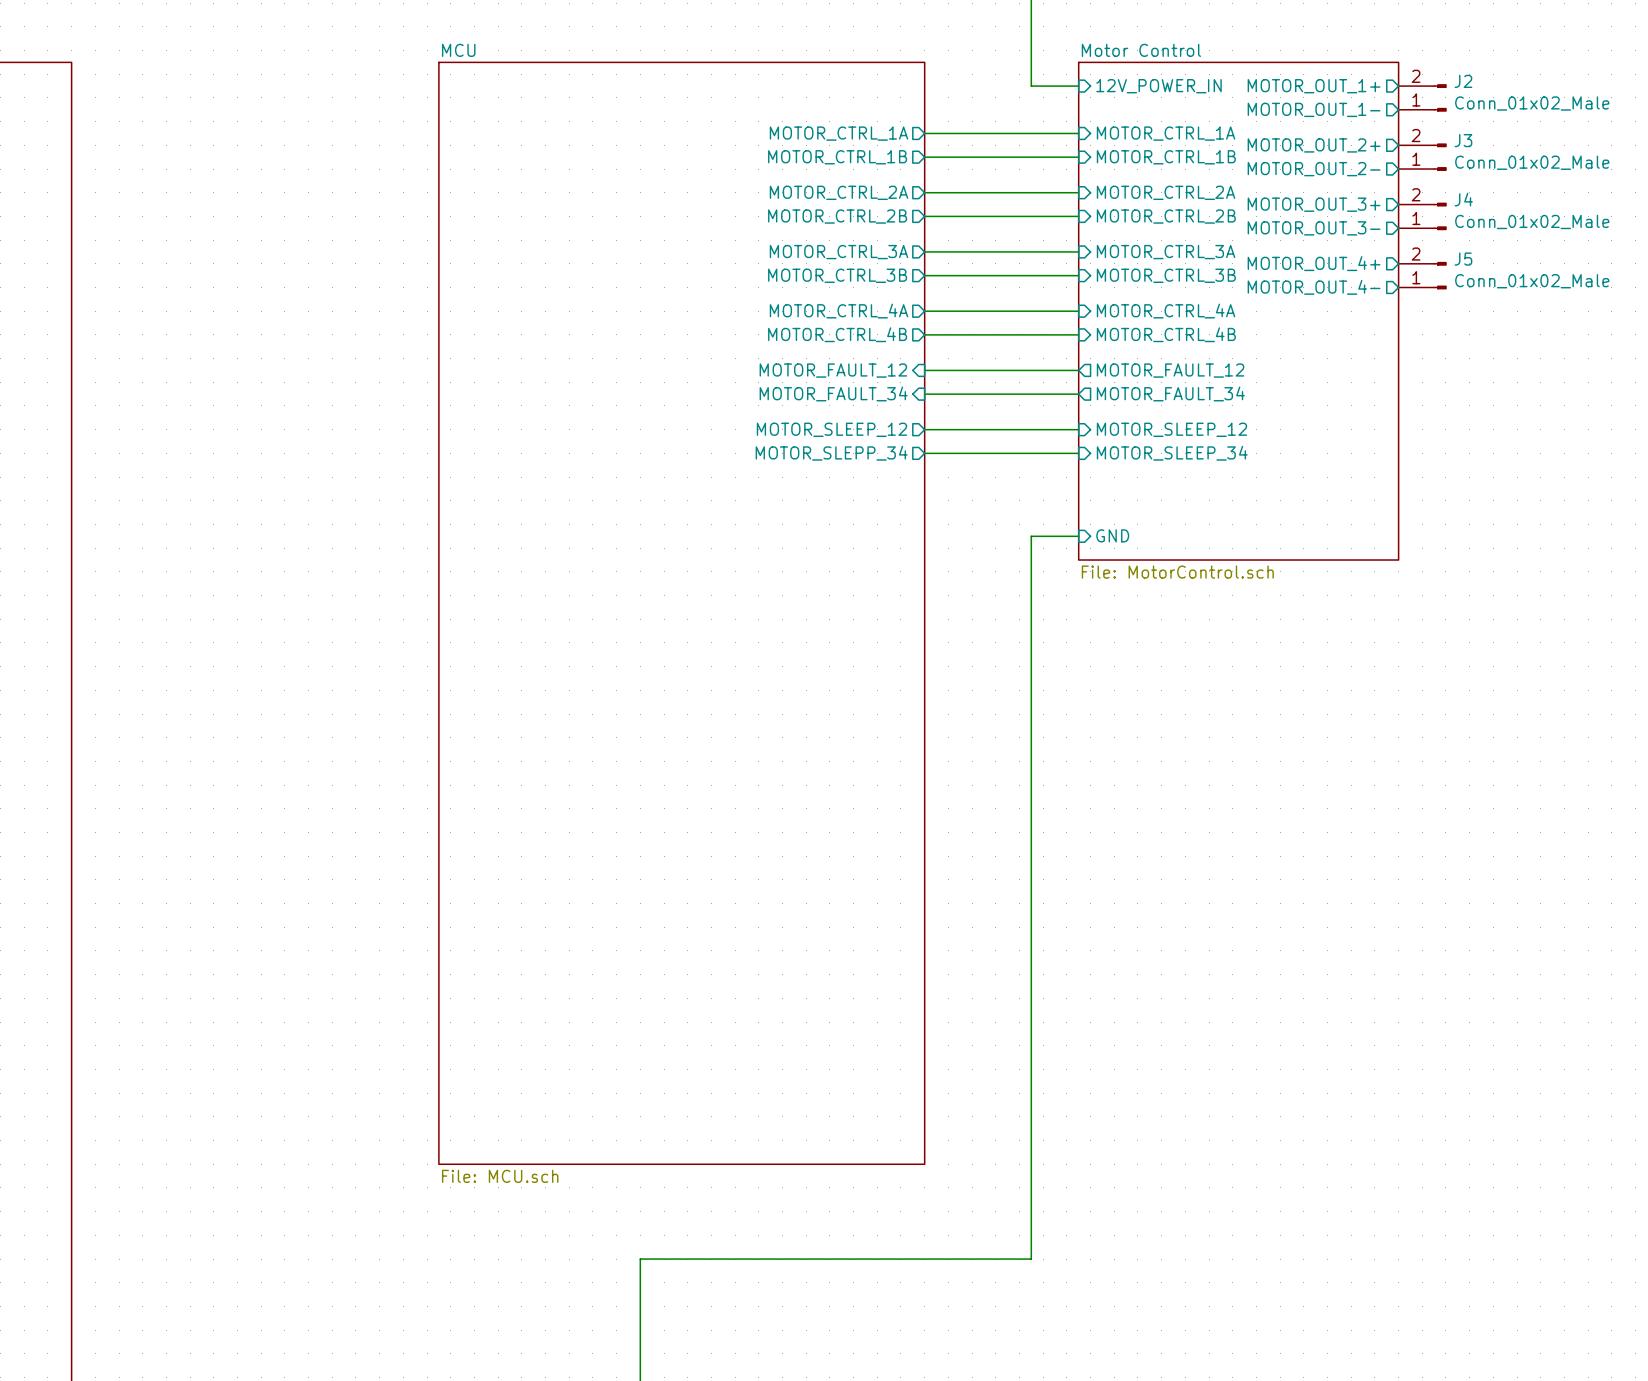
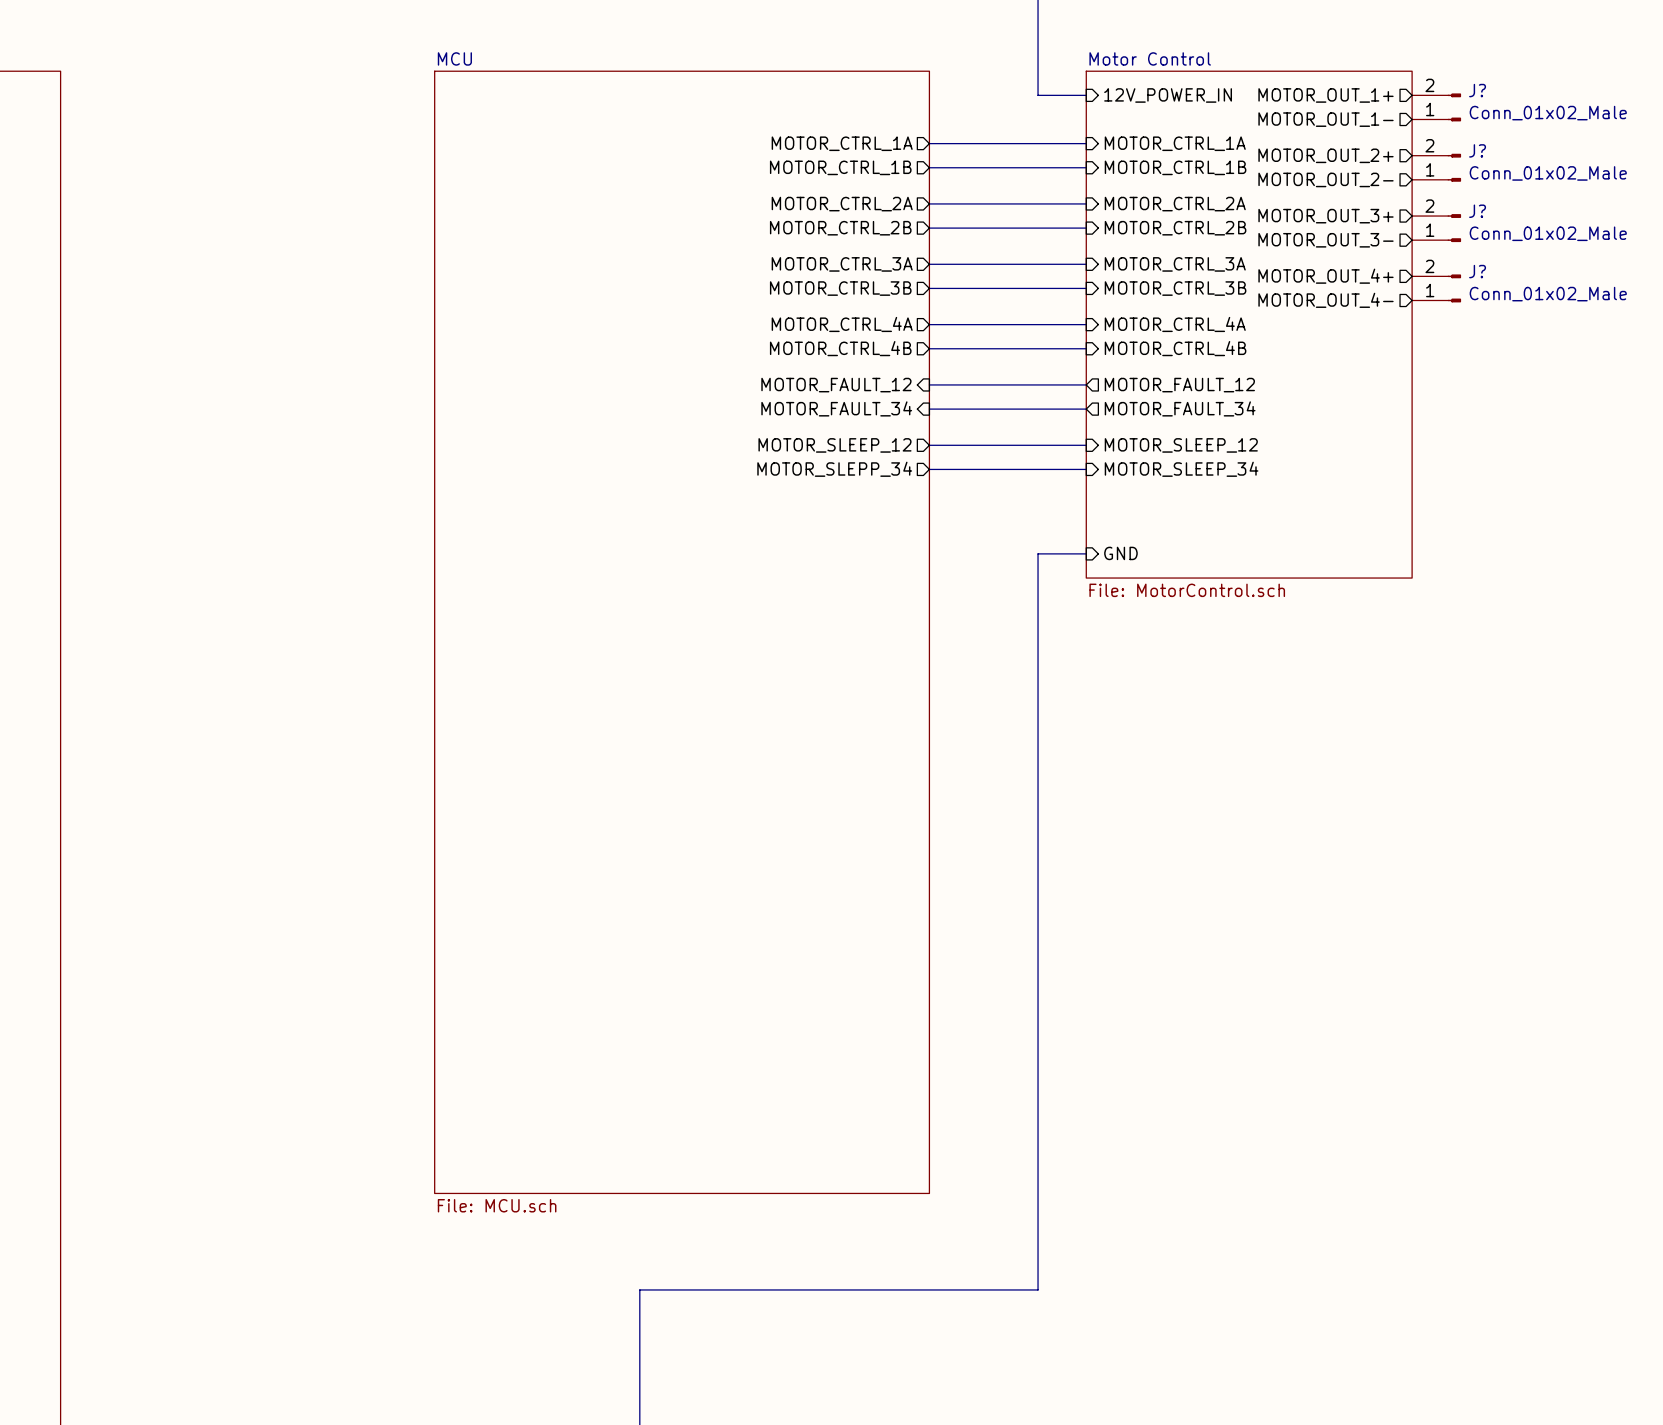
J2 name: J2 (1463, 81) -> J? (1477, 90)
J3 name: J3 (1463, 140) -> J? (1477, 150)
J4 name: J4 (1463, 199) -> J? (1477, 211)
J5 name: J5 (1463, 259) -> J? (1477, 271)

